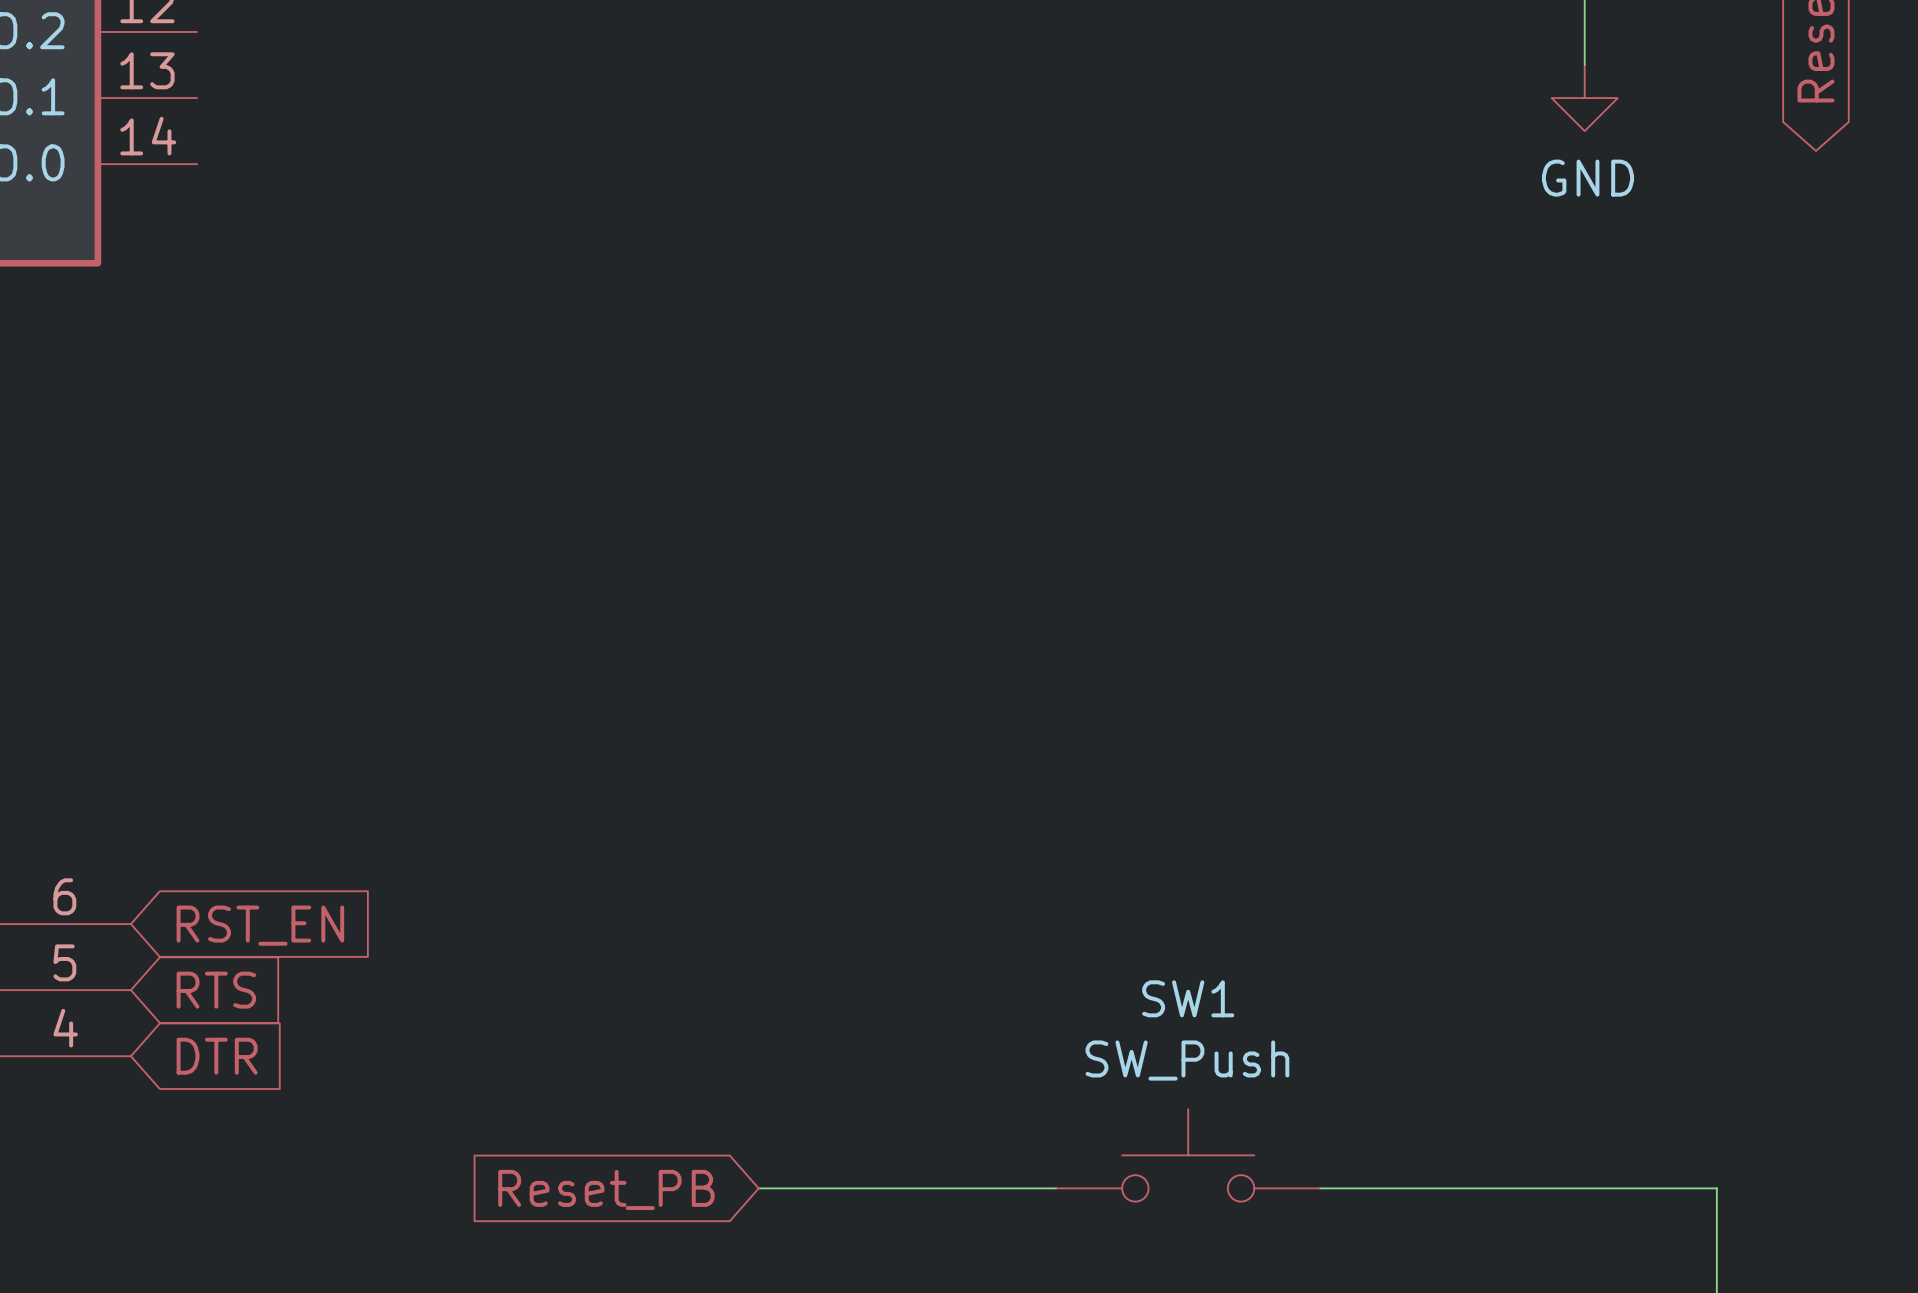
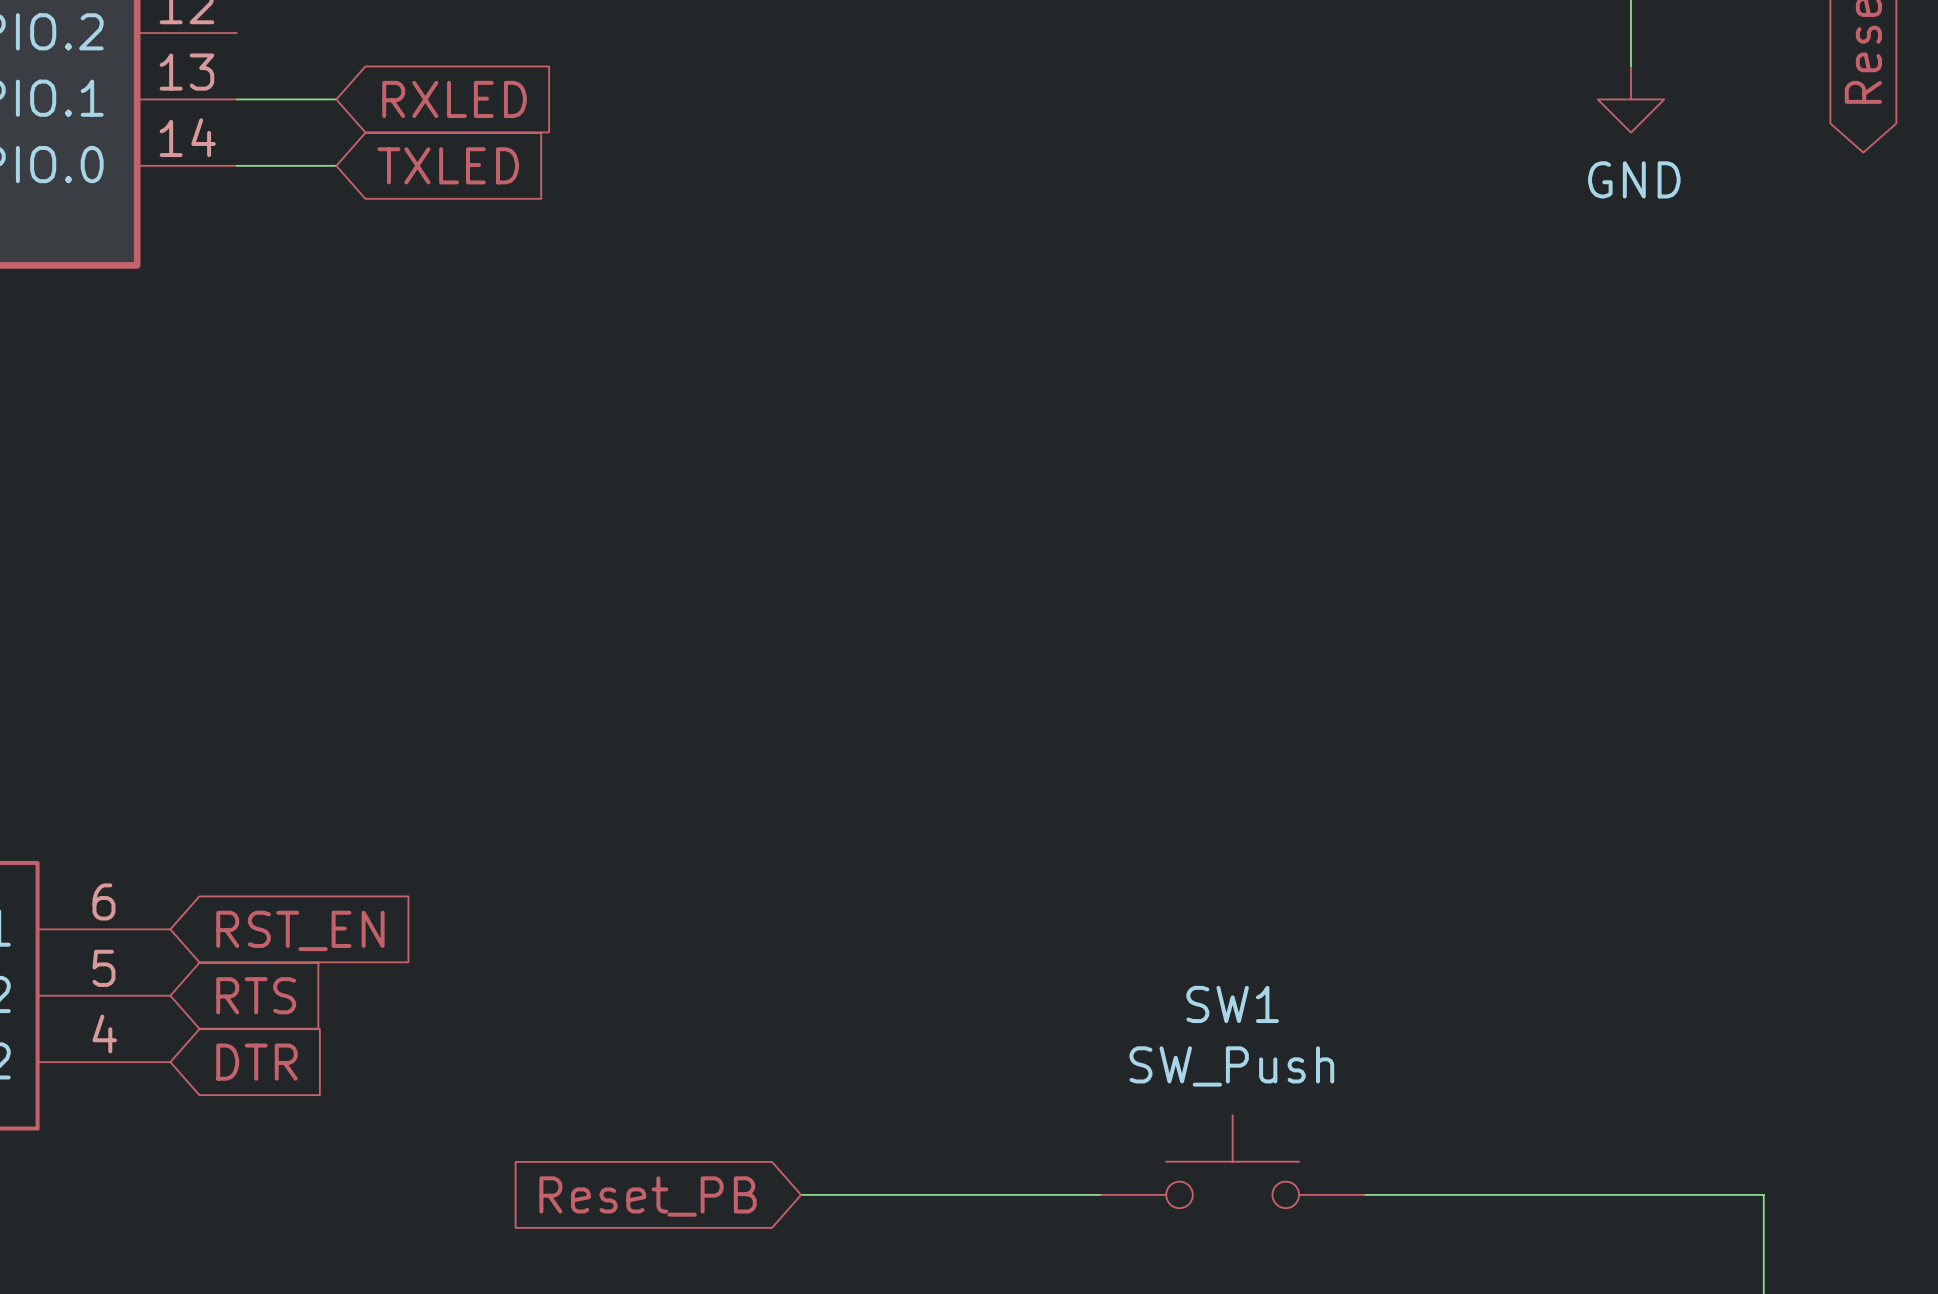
wire: none -> (236, 99) (336, 99)
global label: none -> RXLED (454, 99)
wire: none -> (236, 165) (336, 165)
global label: none -> TXLED (448, 165)

